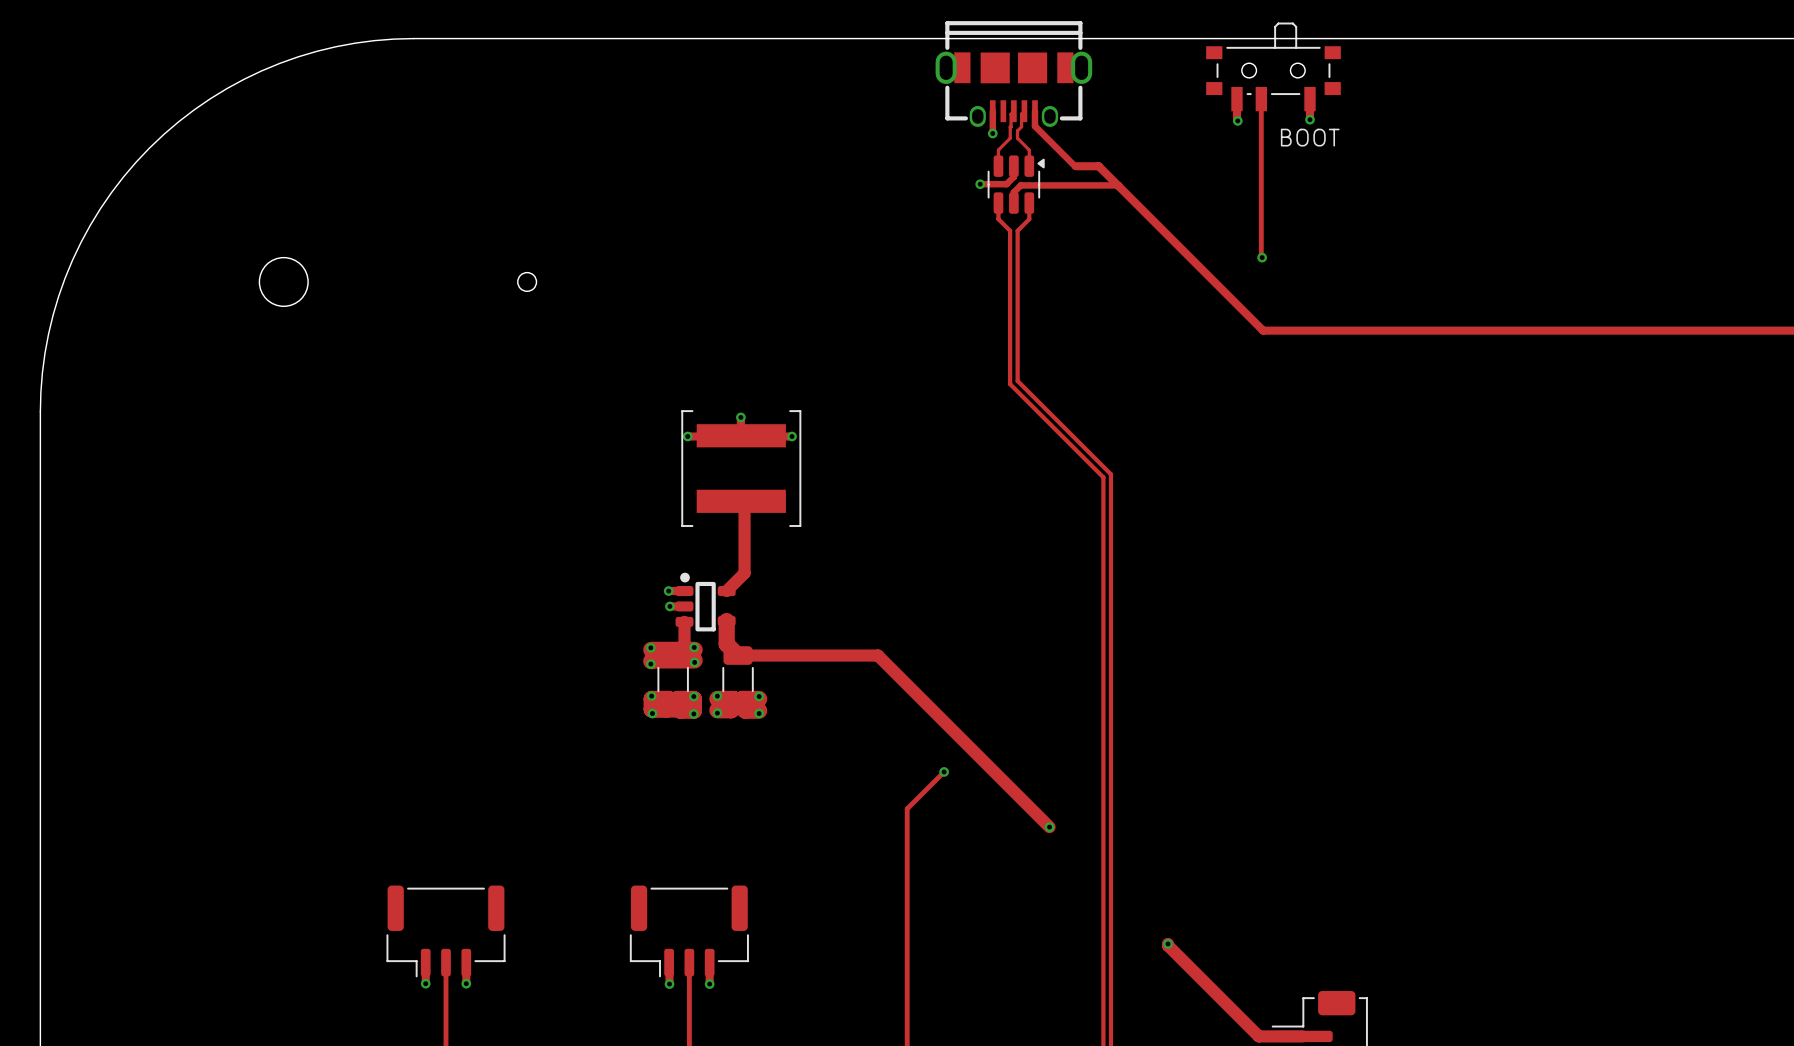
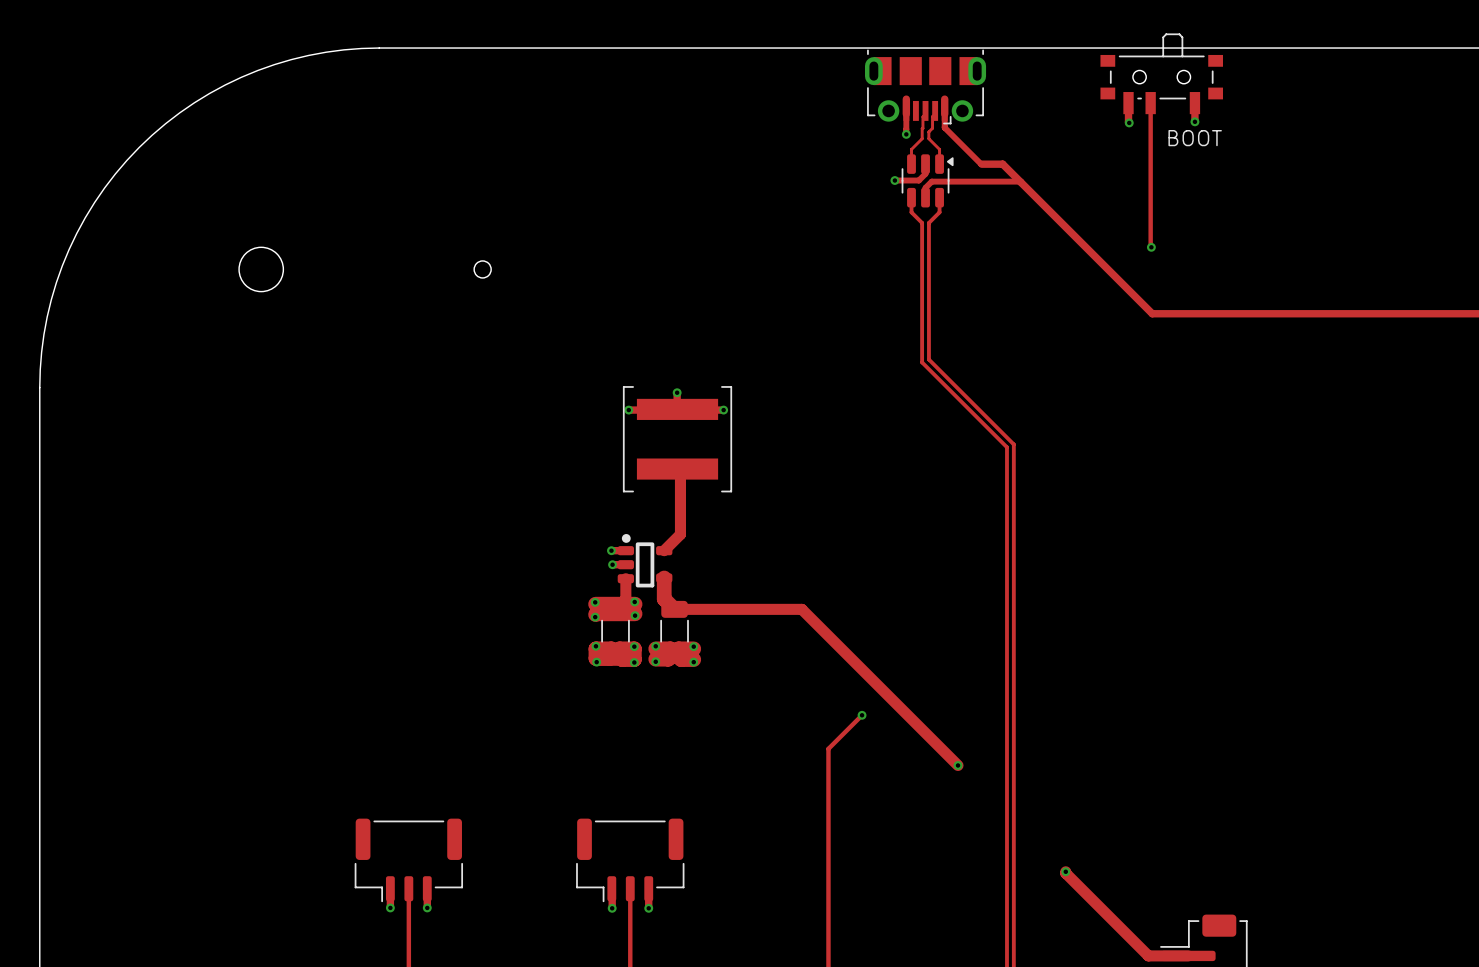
part footprint: [935, 21, 1093, 128] -> [865, 49, 987, 125]
track: none -> (906, 99) (906, 114)
track: none -> (944, 99) (944, 114)

